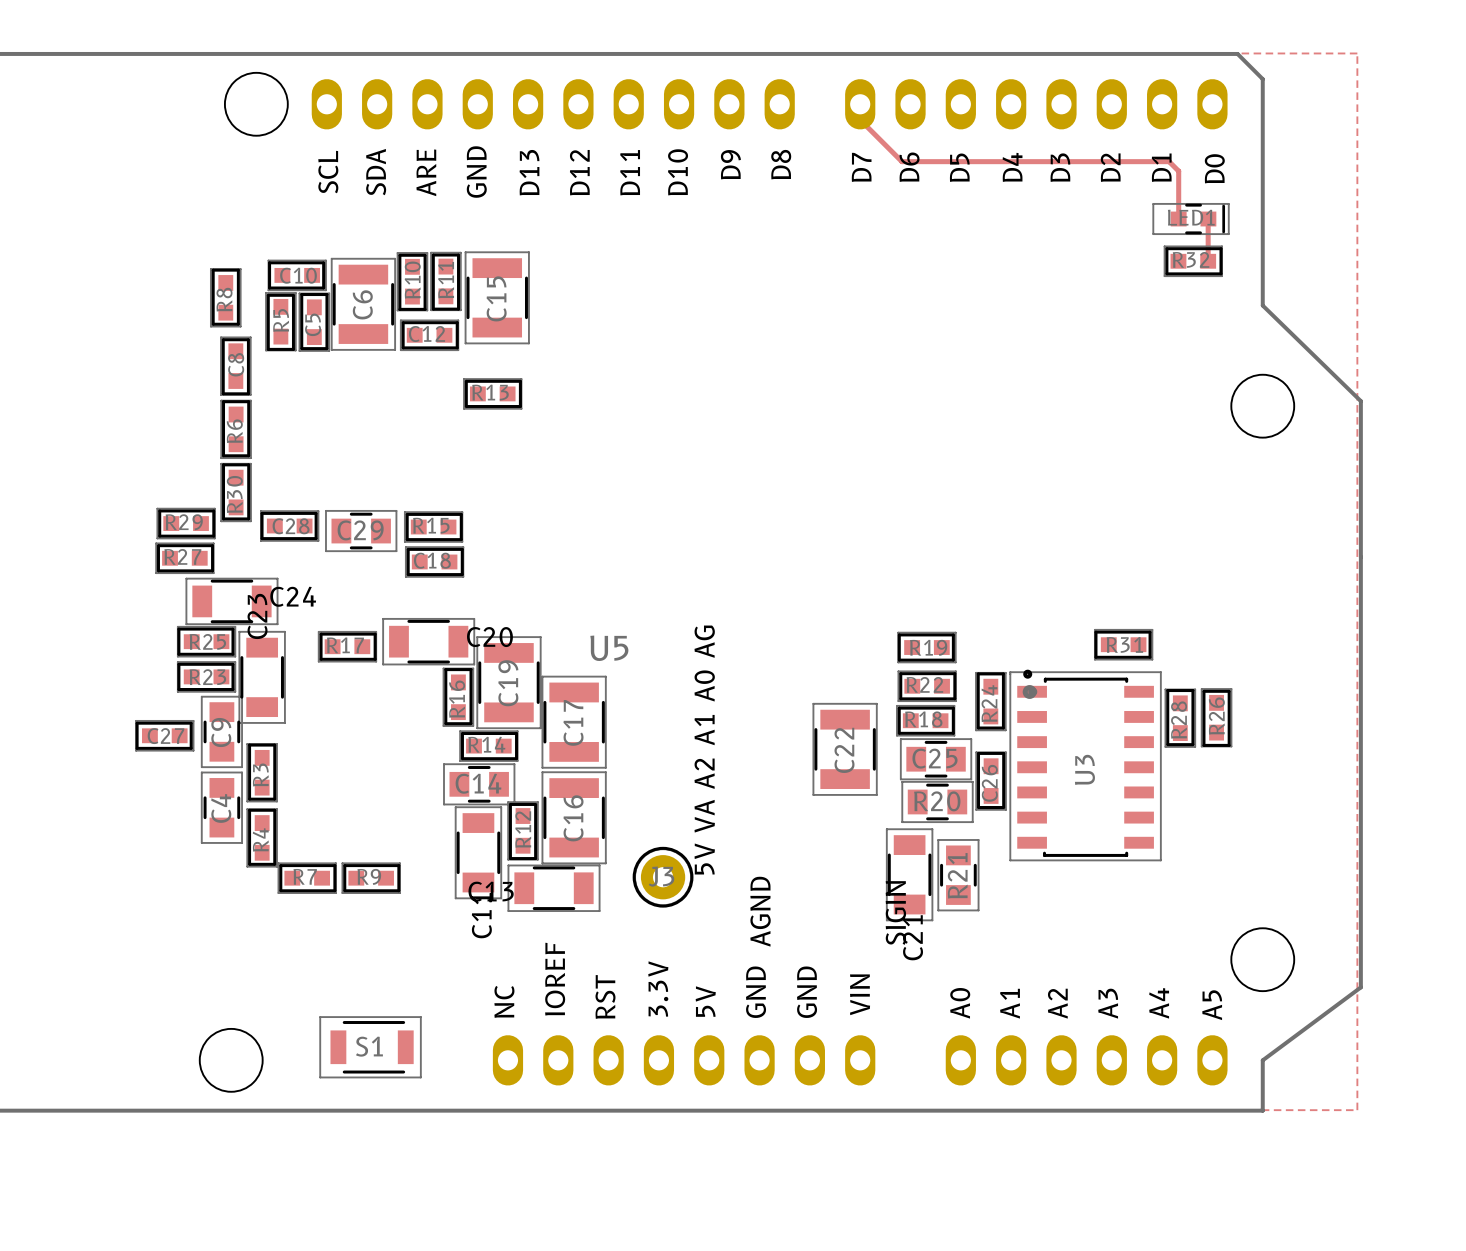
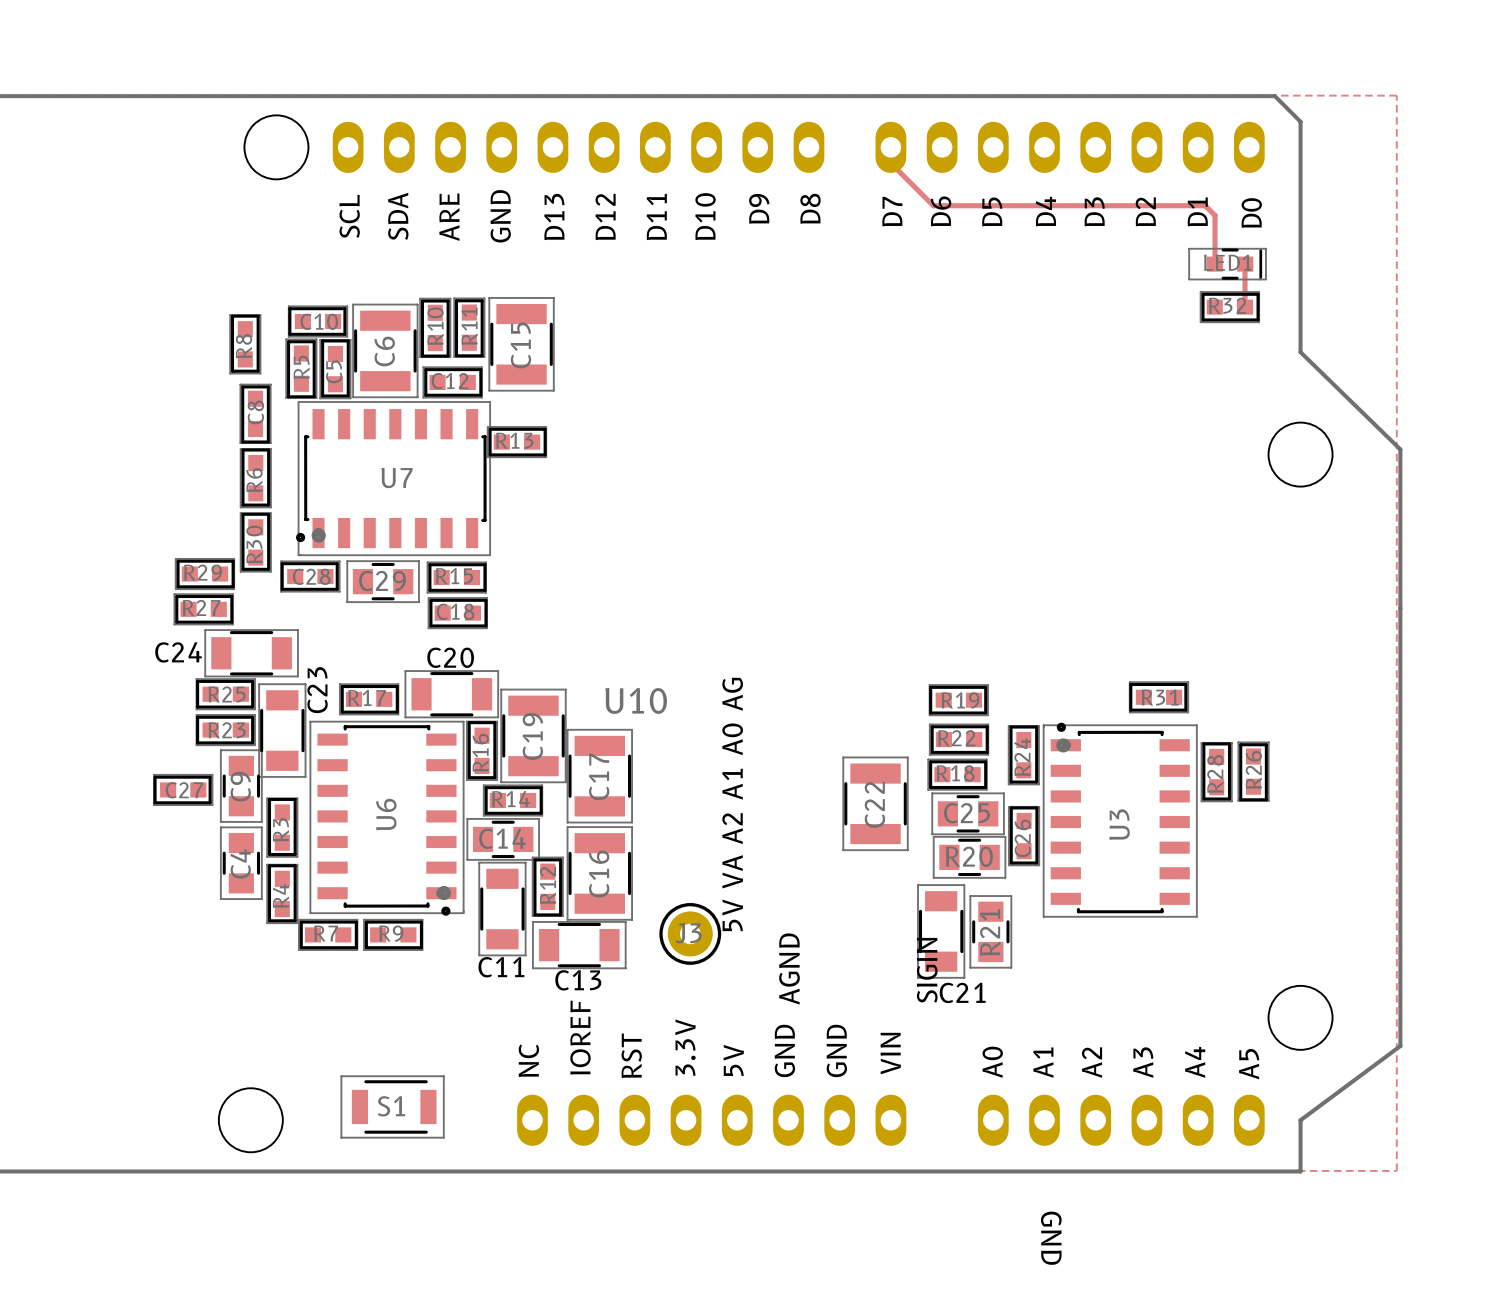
U7: none -> (393, 478)
C24 name position: C24 (293, 596) -> C24 (178, 652)
C23 name position: C23 (257, 616) -> C23 (317, 690)
C20 name position: C20 (489, 637) -> C20 (450, 657)
U5 name: U5 (609, 648) -> U10 (636, 700)
U6: none -> (386, 818)
C13 name position: C13 (491, 891) -> C13 (578, 980)
C11 name rotation: 0° (481, 915) -> 90° clockwise (501, 967)
C21 name rotation: 0° (913, 937) -> 90° clockwise (962, 992)
text: none -> GND (1051, 1238)

